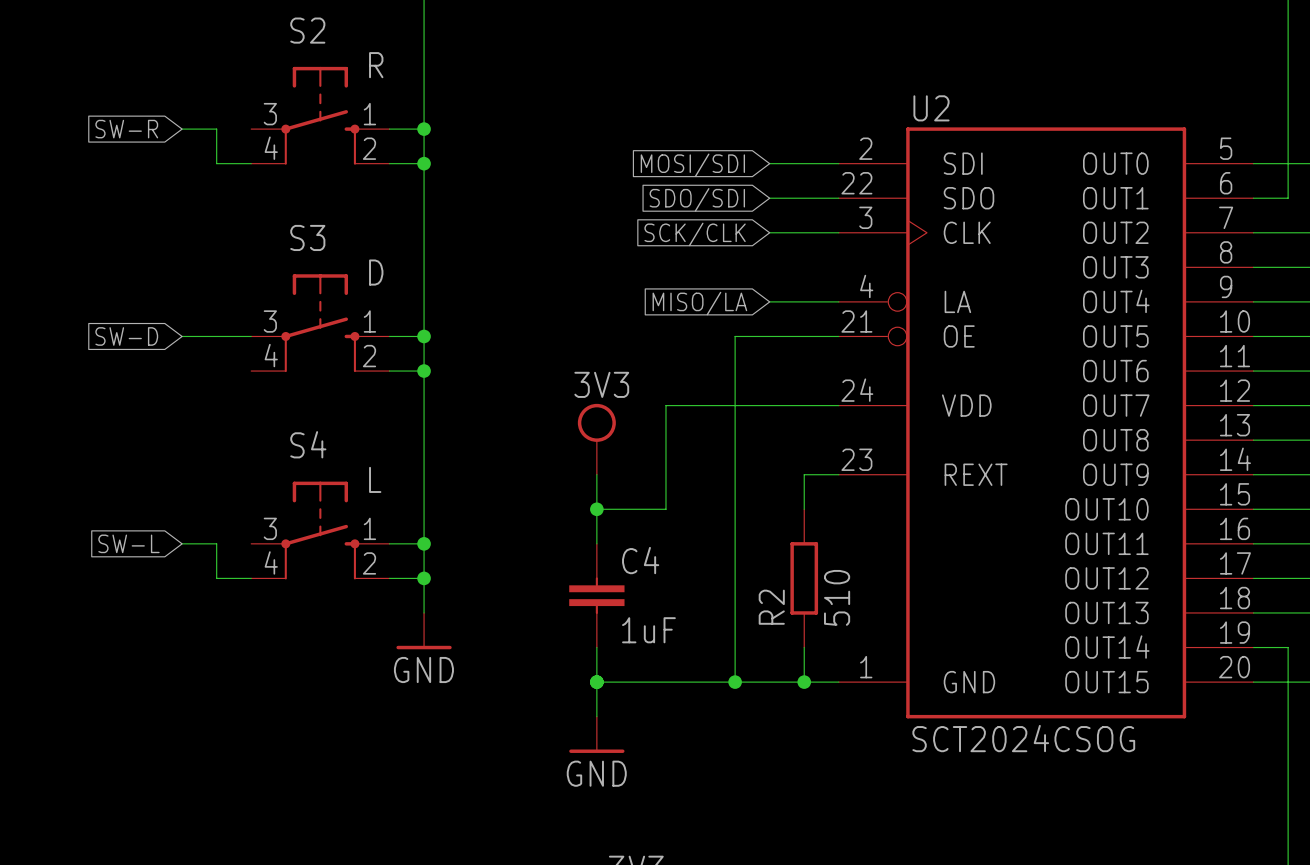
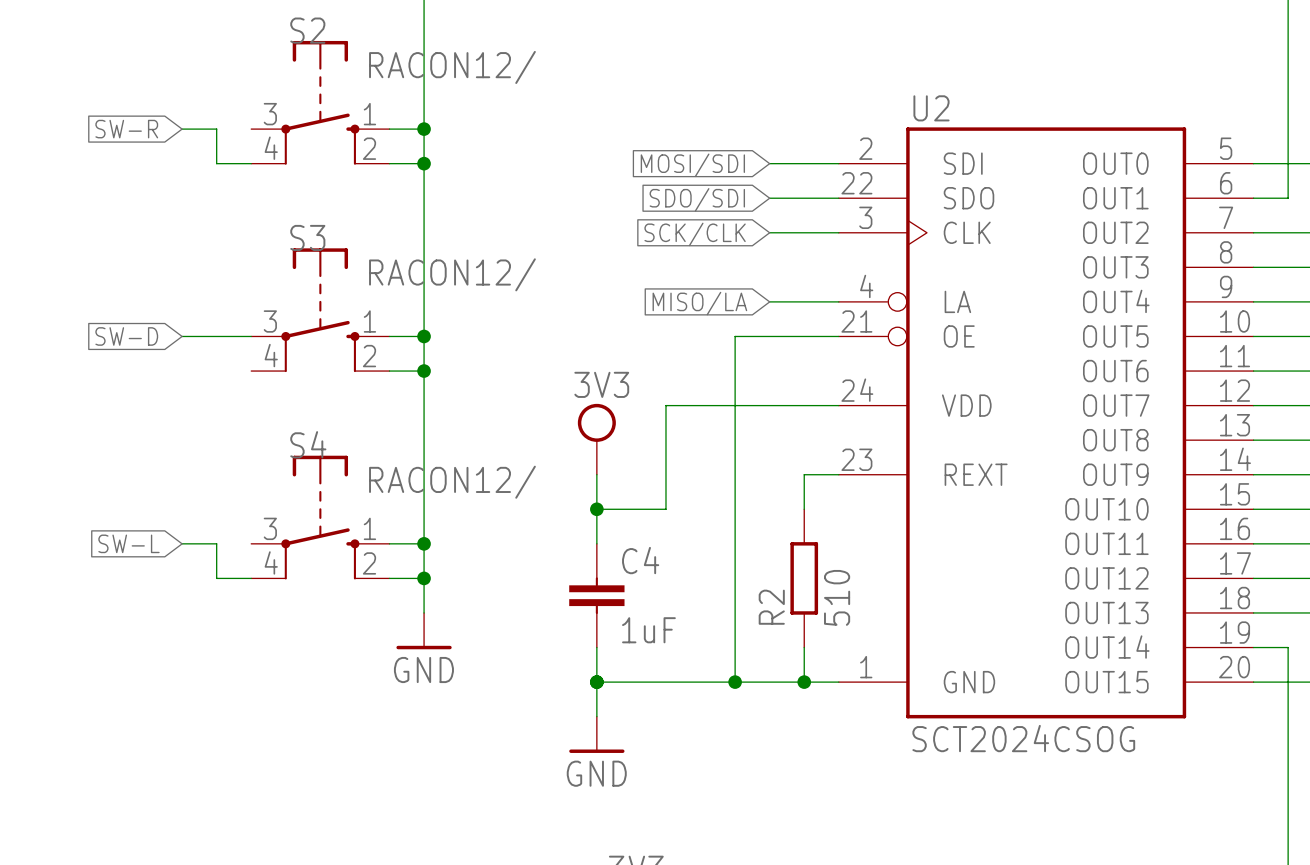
S2 value: R (376, 65) -> RACON12/ (452, 67)
S2 symbol: [251, 66, 390, 165] -> [251, 40, 390, 165]
S3 value: D (376, 272) -> RACON12/ (452, 274)
S3 symbol: [251, 274, 390, 373] -> [251, 248, 390, 373]
S4 value: L (375, 479) -> RACON12/ (452, 482)
S4 symbol: [251, 481, 390, 580] -> [251, 455, 390, 580]

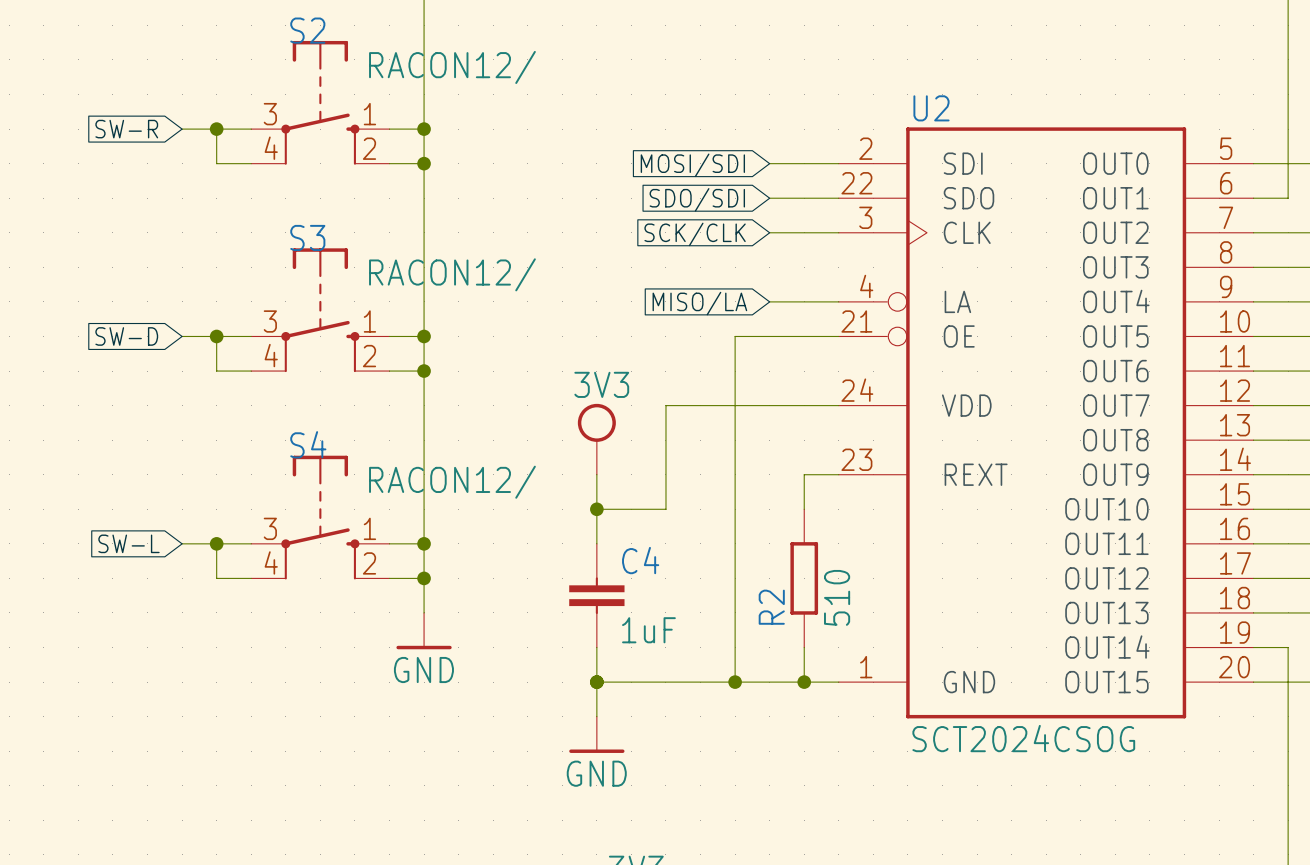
wire: none -> (216, 129) (251, 129)
junction: none -> (216, 129)
wire: none -> (216, 336) (216, 371) (251, 371)
junction: none -> (216, 336)
wire: none -> (216, 543) (251, 543)
junction: none -> (216, 543)

